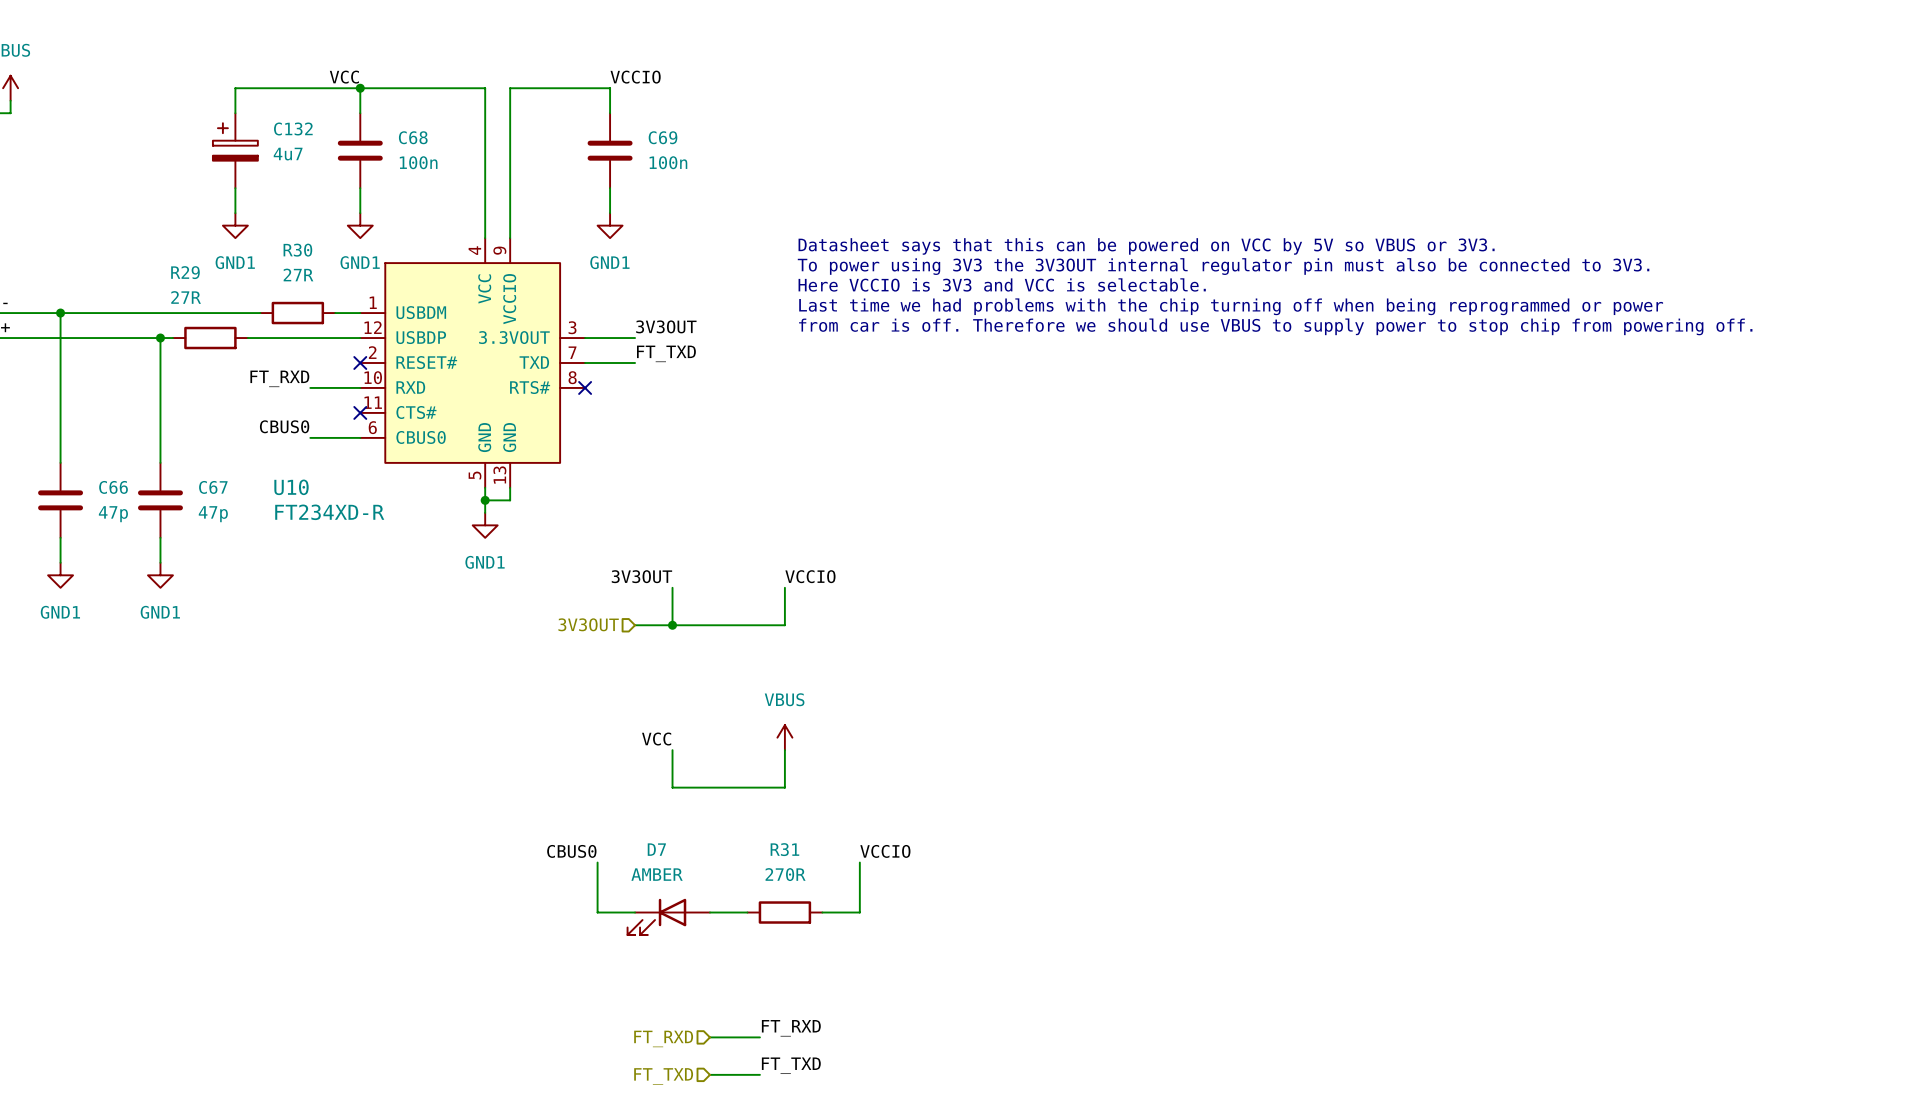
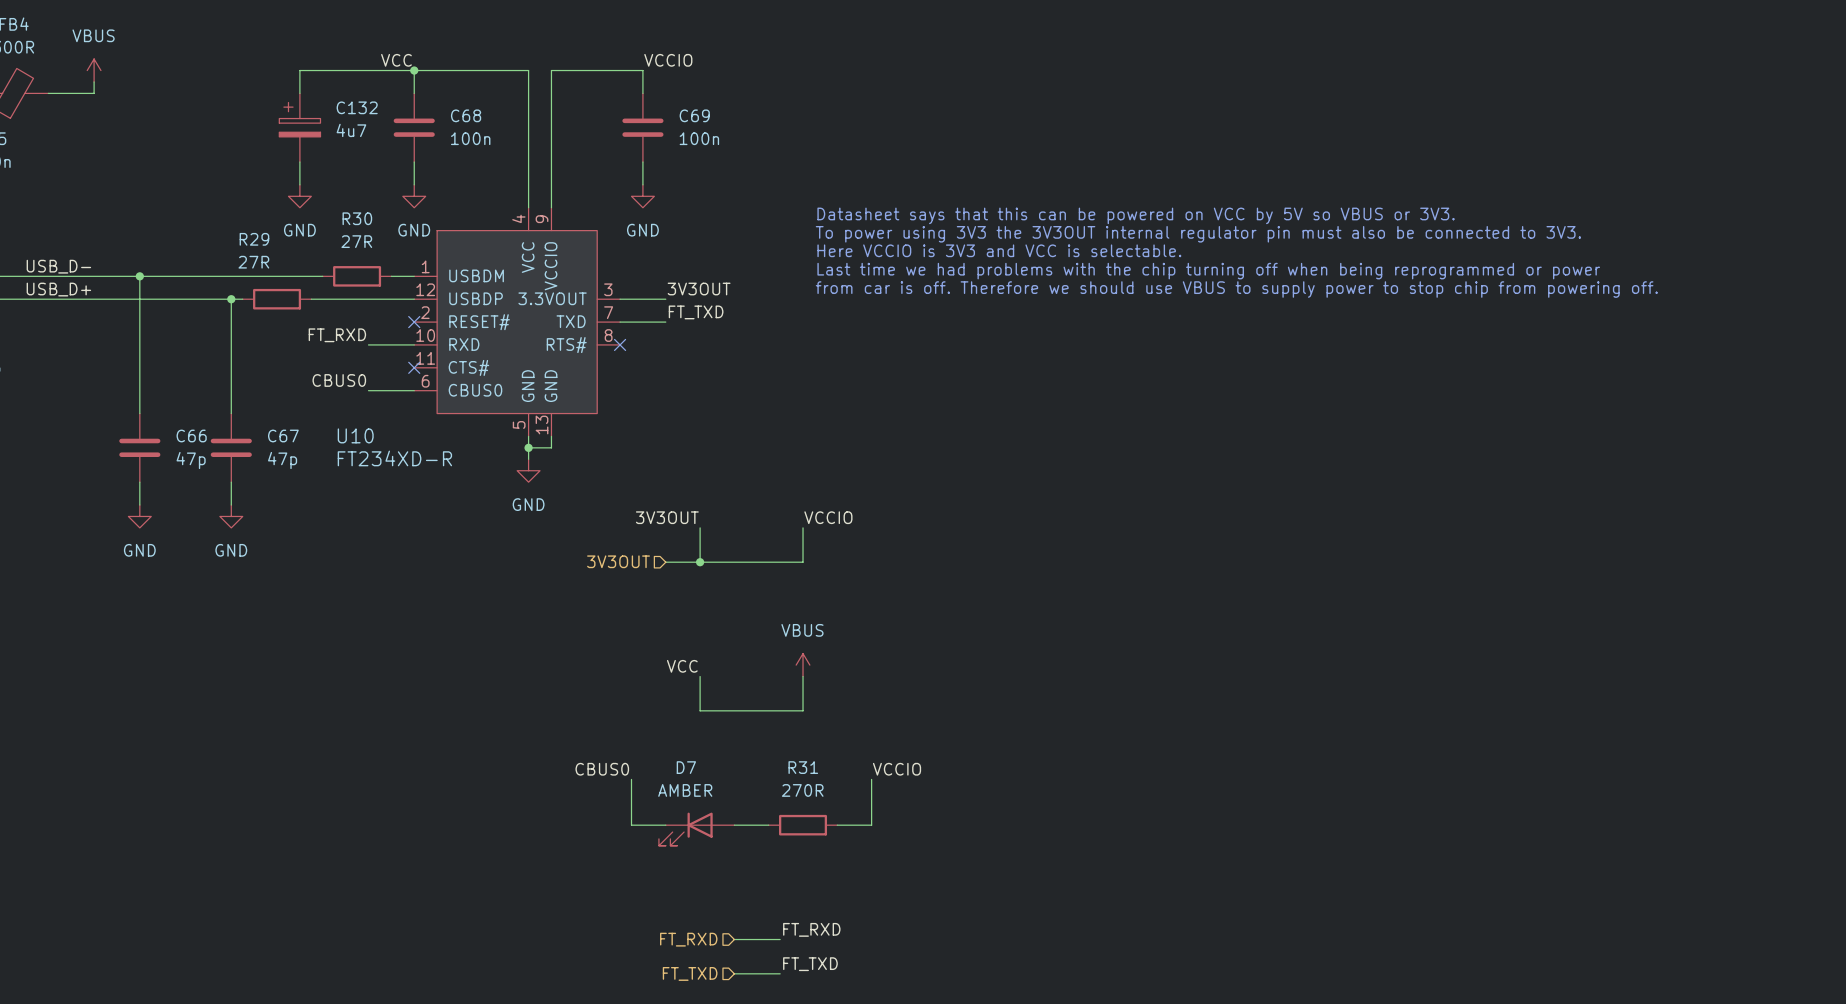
power symbol: GND1 (235, 225) -> GND (299, 196)
power symbol: GND1 (360, 225) -> GND (414, 196)
power symbol: GND1 (610, 225) -> GND (642, 196)
power symbol: GND1 (485, 525) -> GND (528, 470)
power symbol: GND1 (60, 575) -> GND (139, 516)
power symbol: GND1 (160, 575) -> GND (231, 516)

